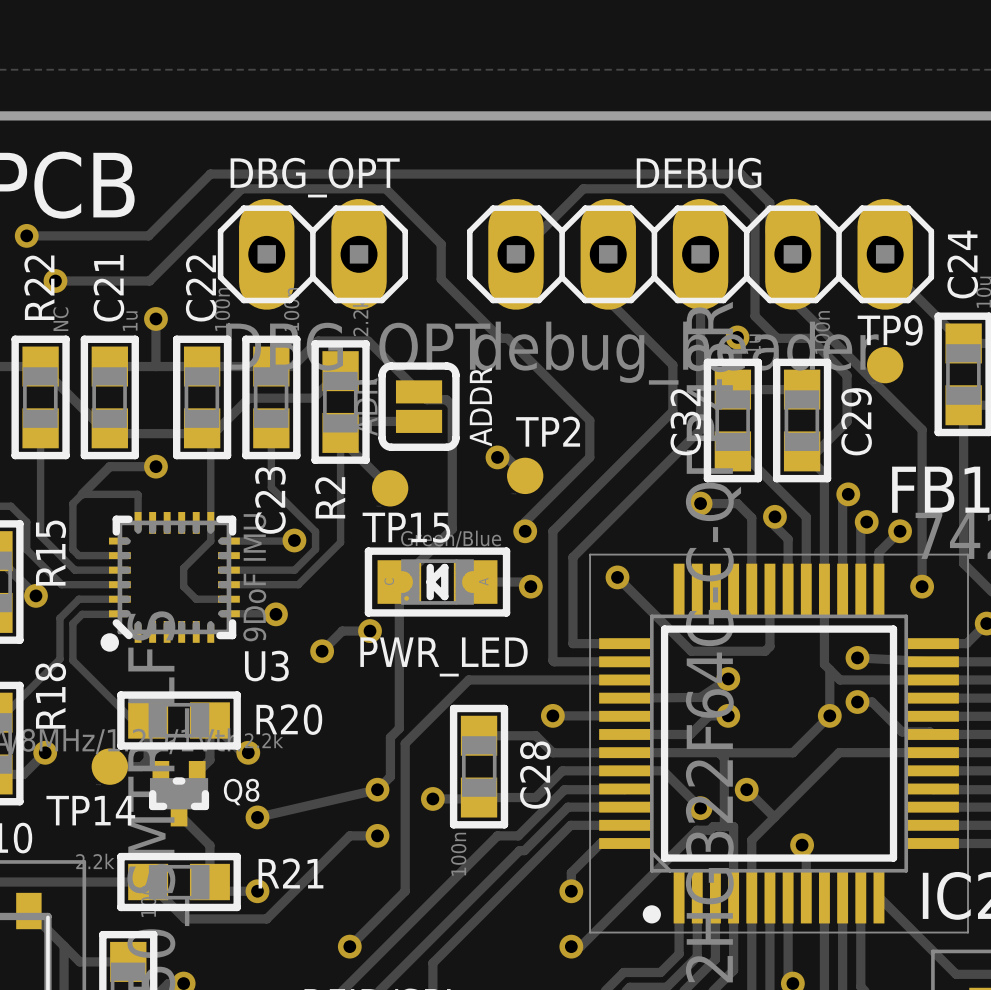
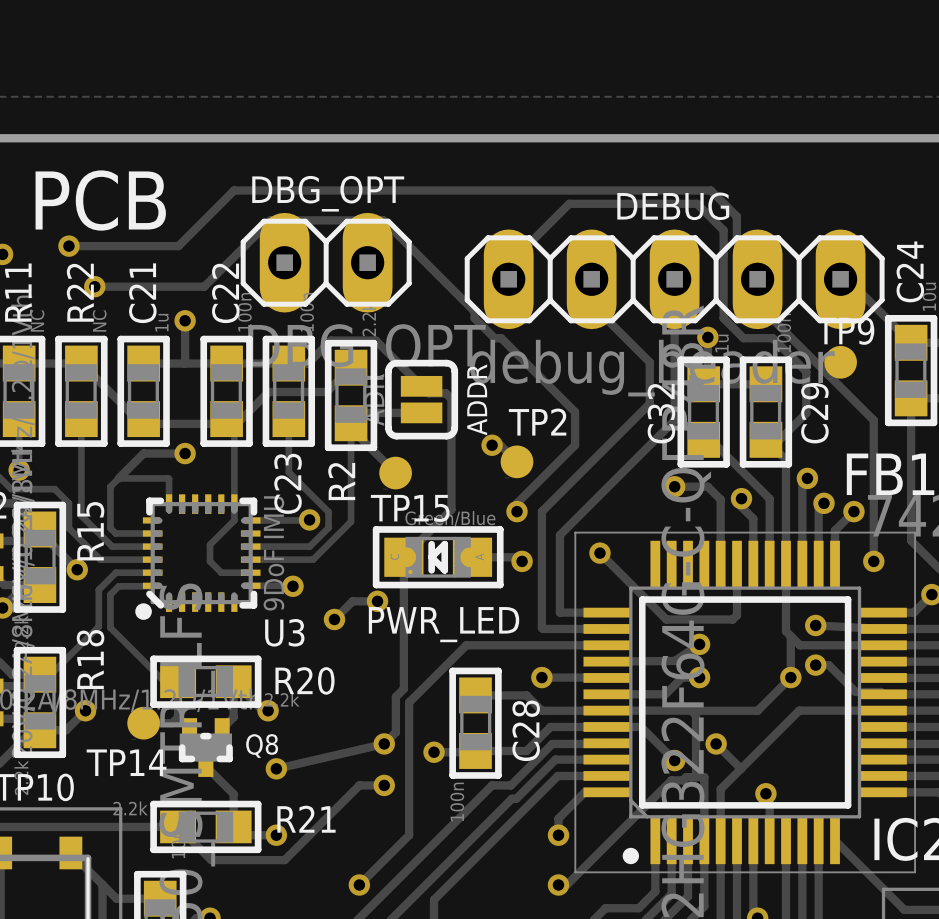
DEBUG position: (700, 254) -> (674, 279)
track: (149, 281) (241, 188) (385, 188) (441, 244) (441, 279) (478, 316) -> (179, 286) (204, 286) (270, 220) (383, 220) (474, 311) (474, 318)

